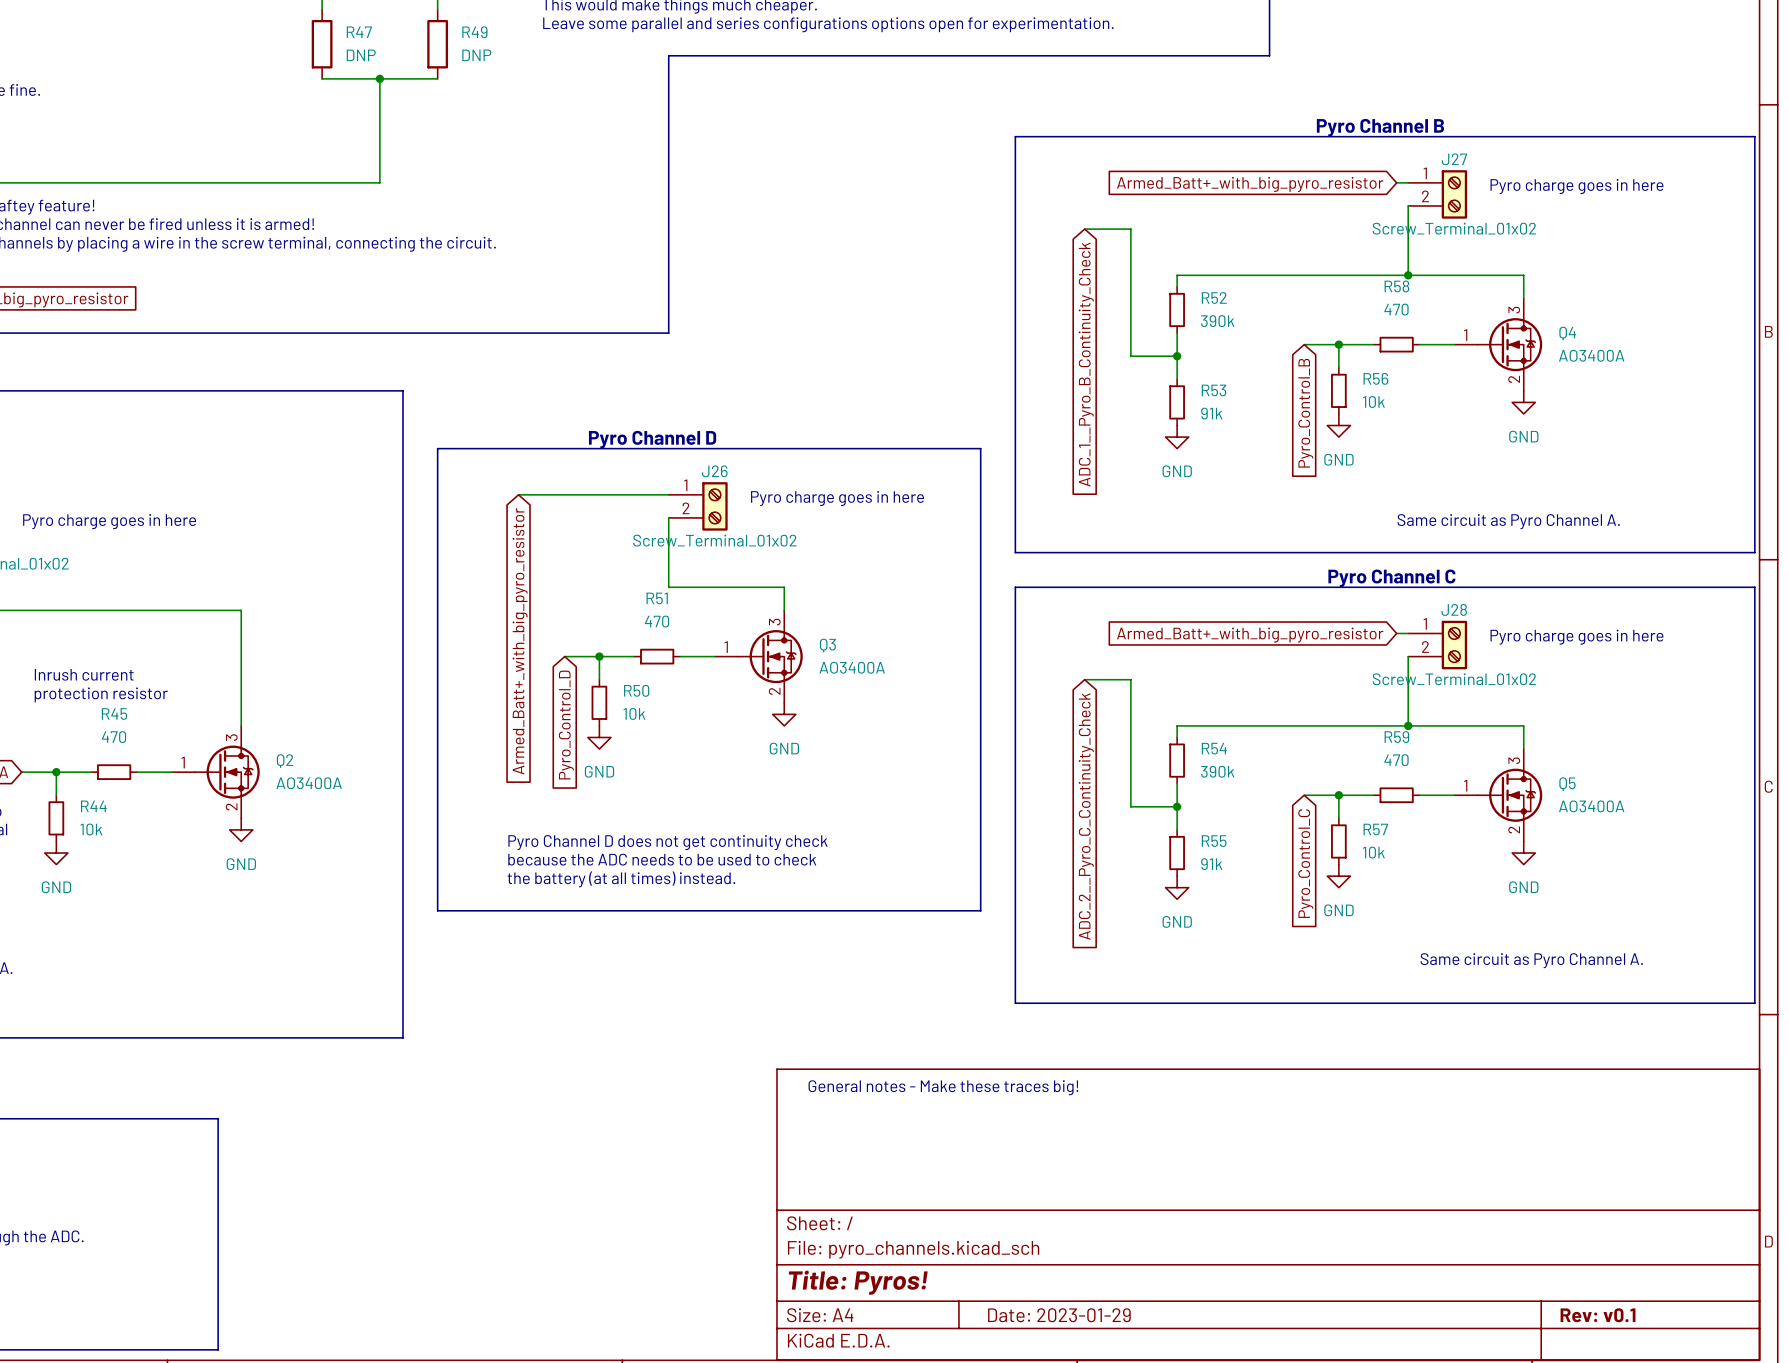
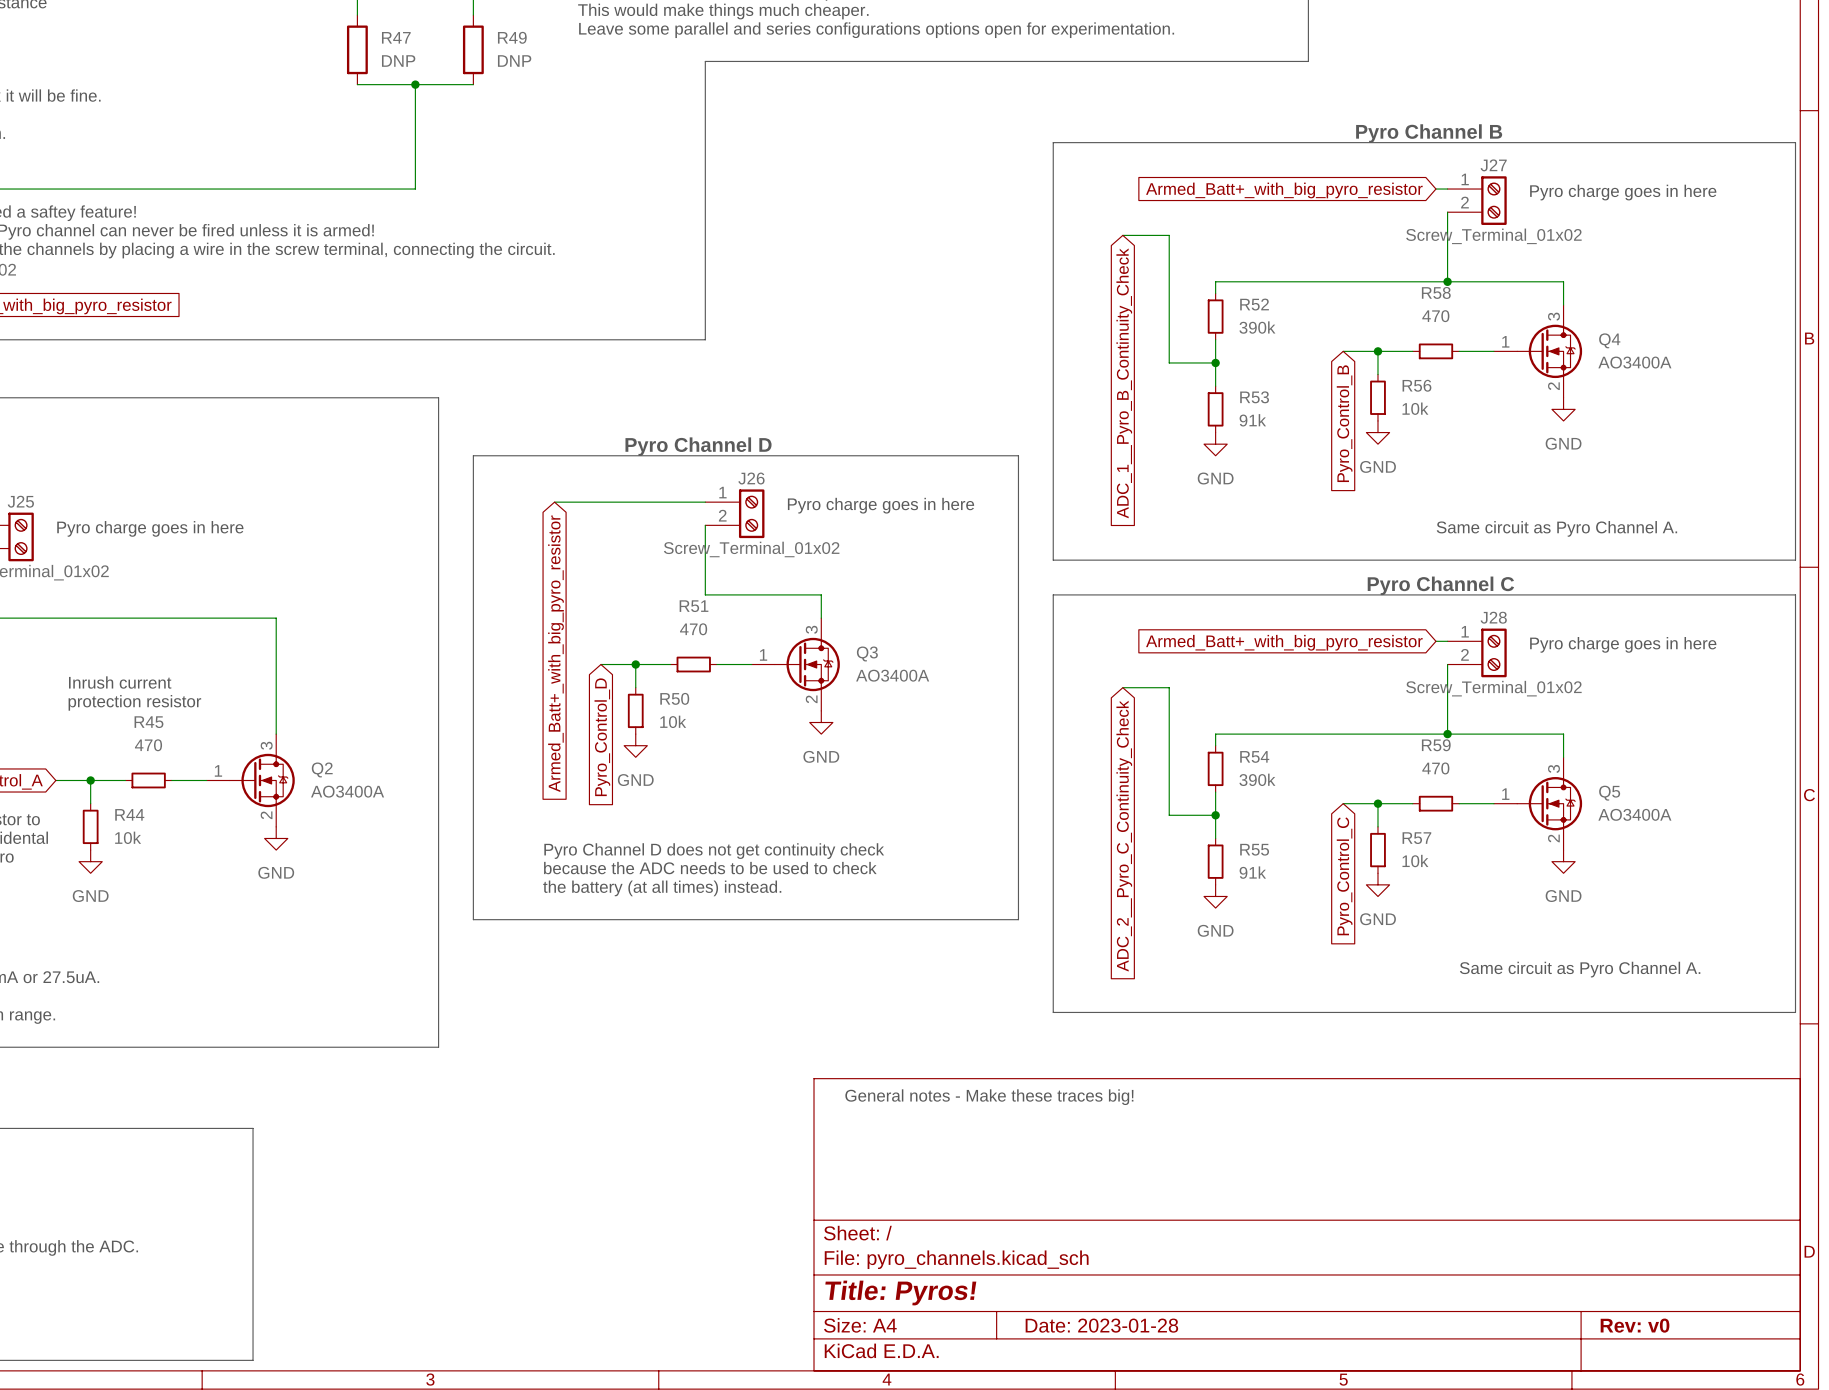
title block: Date: 2023-01-29 (1059, 1315) -> Date: 2023-01-28 (1101, 1325)
title block: Rev: v0.1 (1598, 1315) -> Rev: v0 (1635, 1325)

